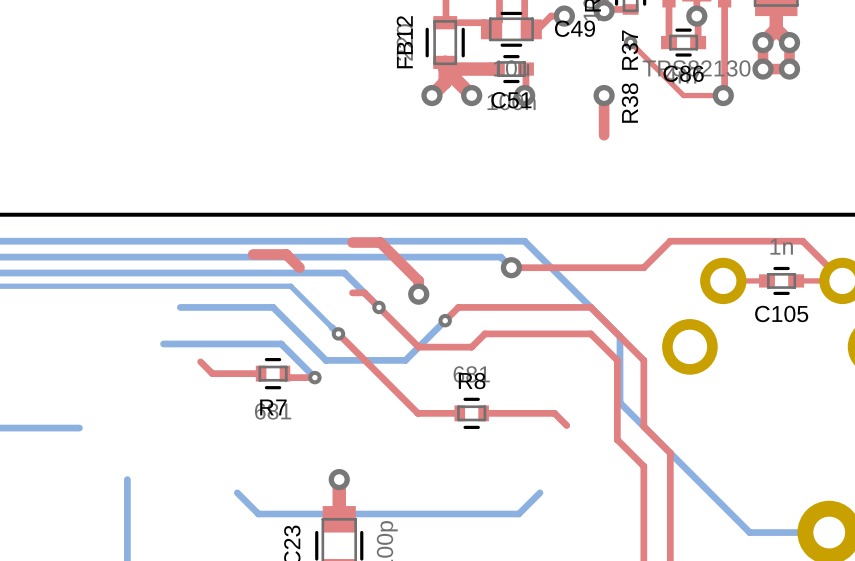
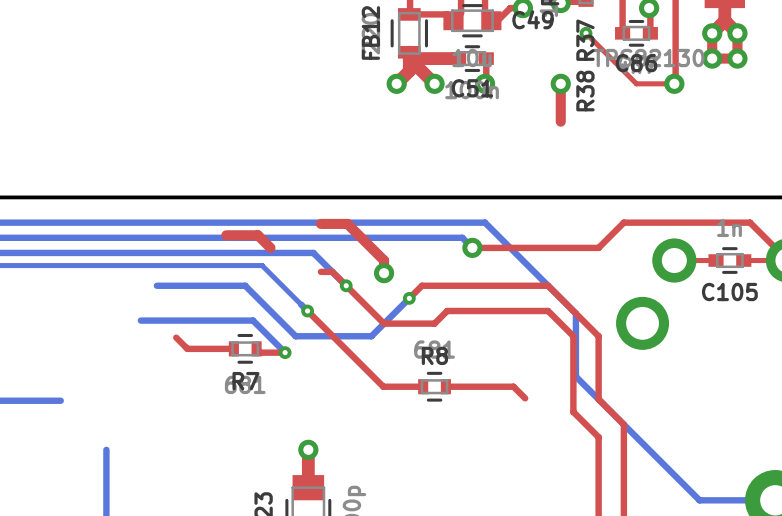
bottom track: (237, 492) (258, 514) (518, 514) (540, 492) -> none

